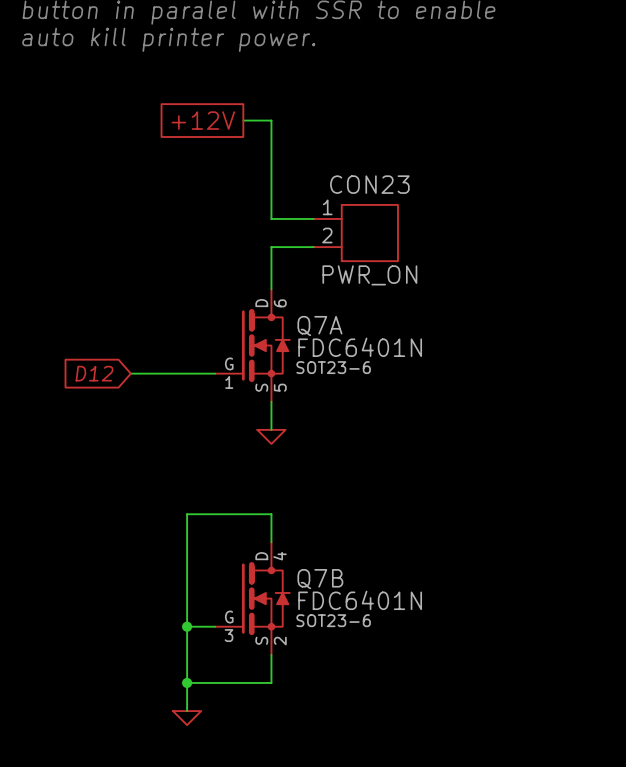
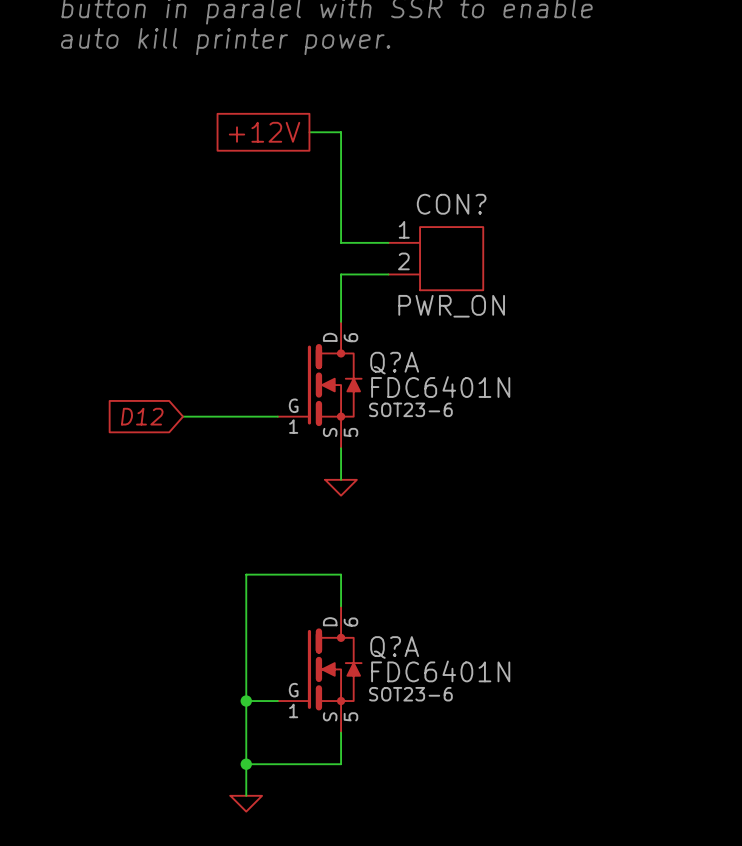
CON23 name: CON23 (369, 184) -> CON? (451, 204)
Q7A name: Q7A (319, 326) -> Q?A (394, 363)
Q7B pin number: 4 (280, 556) -> 6 (350, 622)
Q7B name: Q7B (320, 579) -> Q?A (394, 647)
Q7B pin number: 3 (229, 635) -> 1 (293, 710)
Q7B pin number: 2 (280, 641) -> 5 (350, 716)

